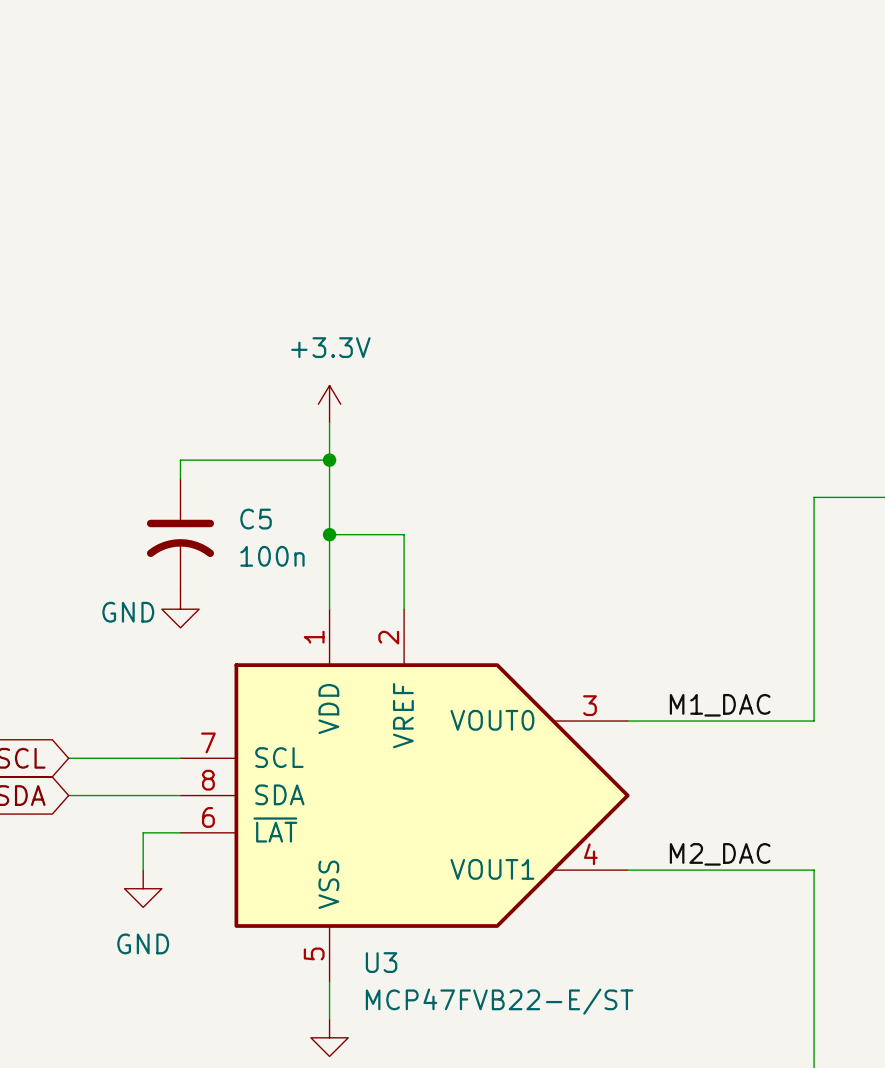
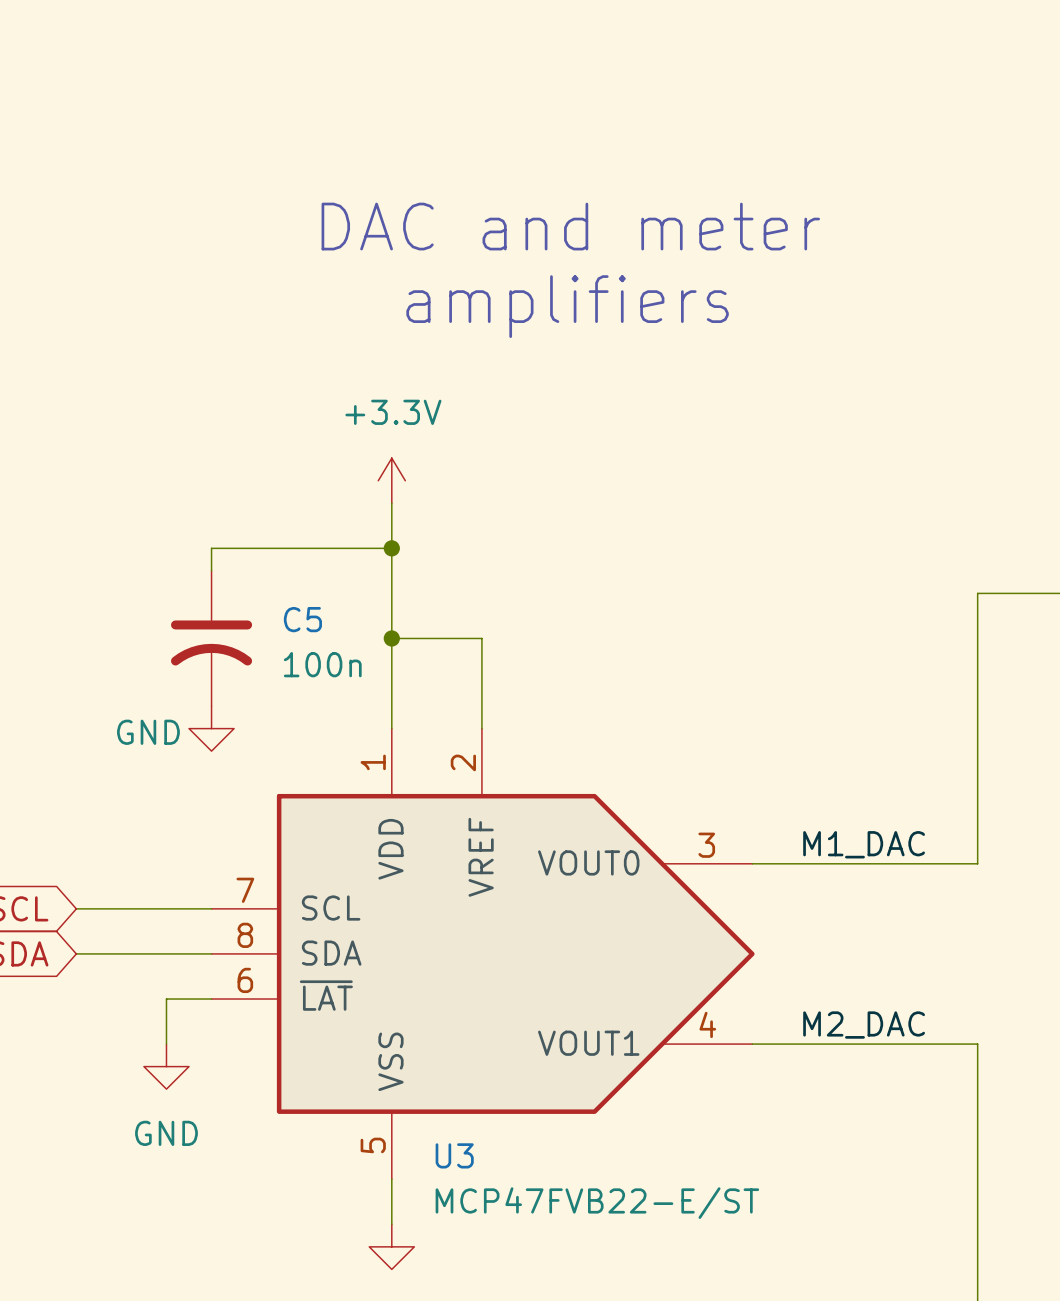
text: none -> DAC and meter (570, 226)
text: none -> amplifiers (567, 306)

